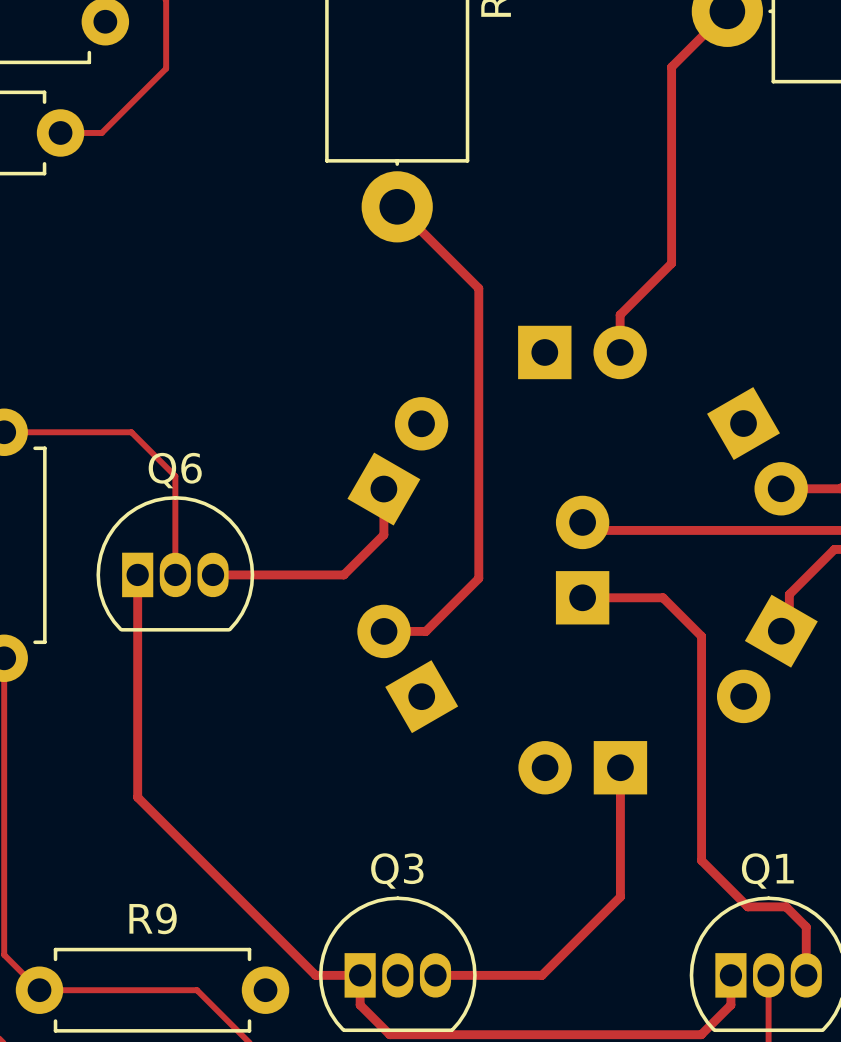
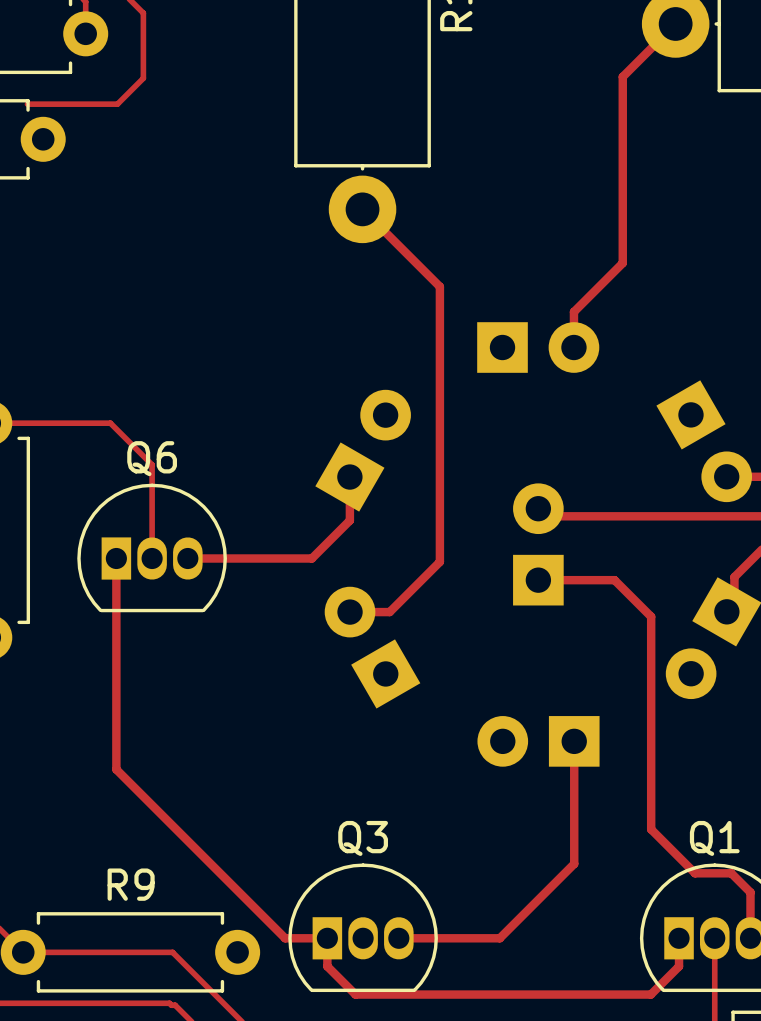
track: (138, 95) (101, 132) (60, 132) -> (117, 104) (27, 104)

